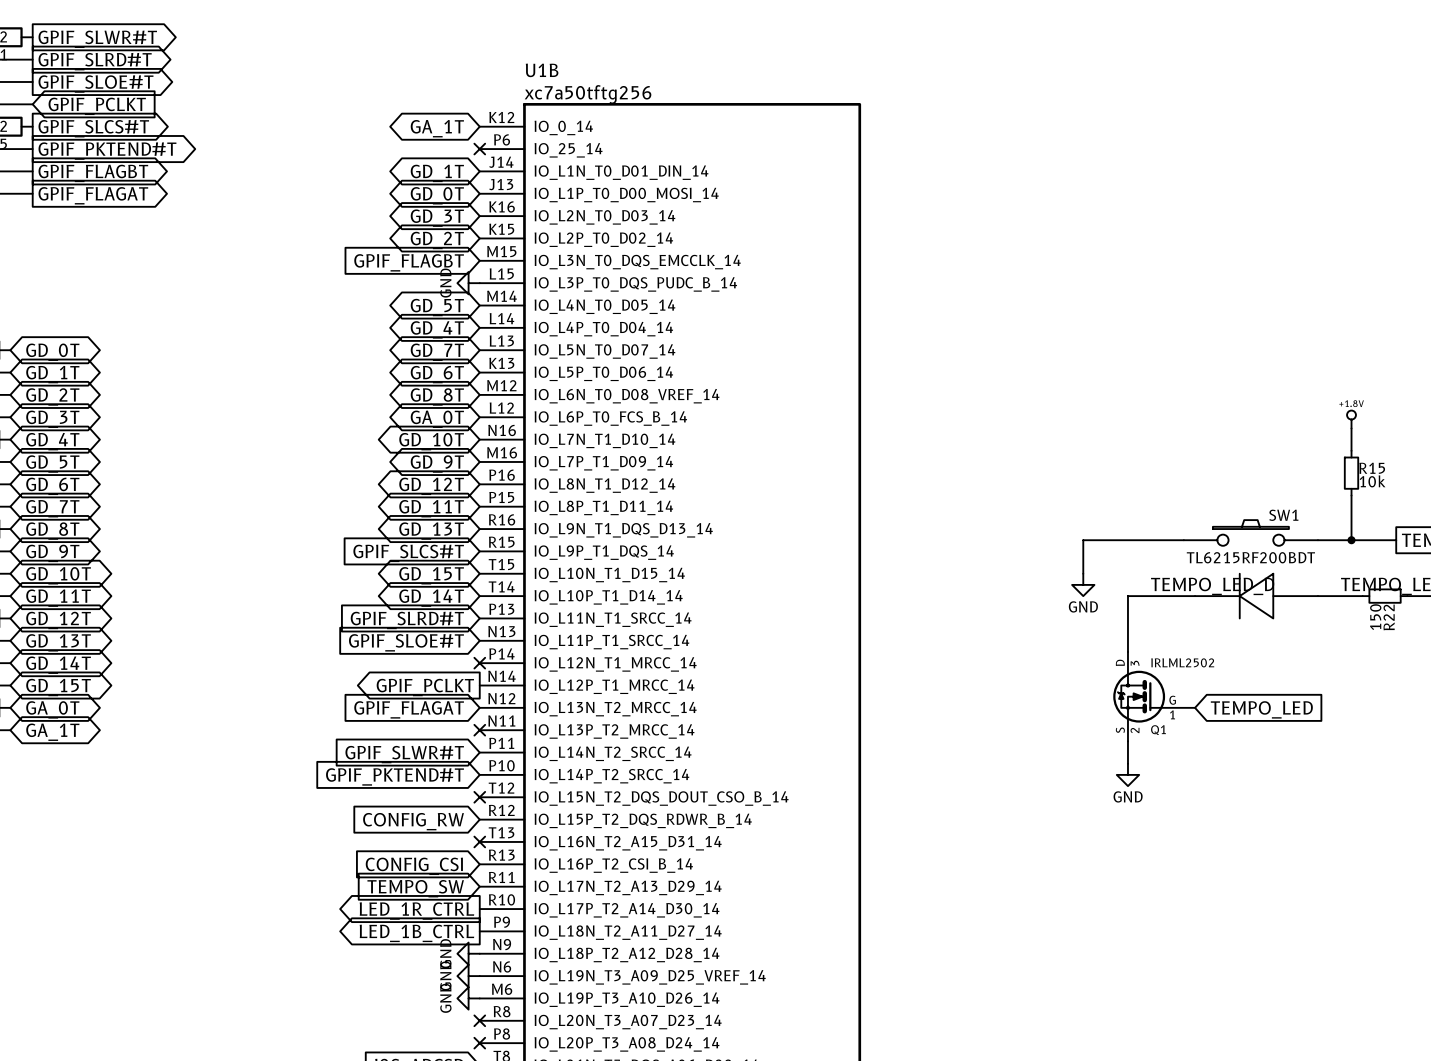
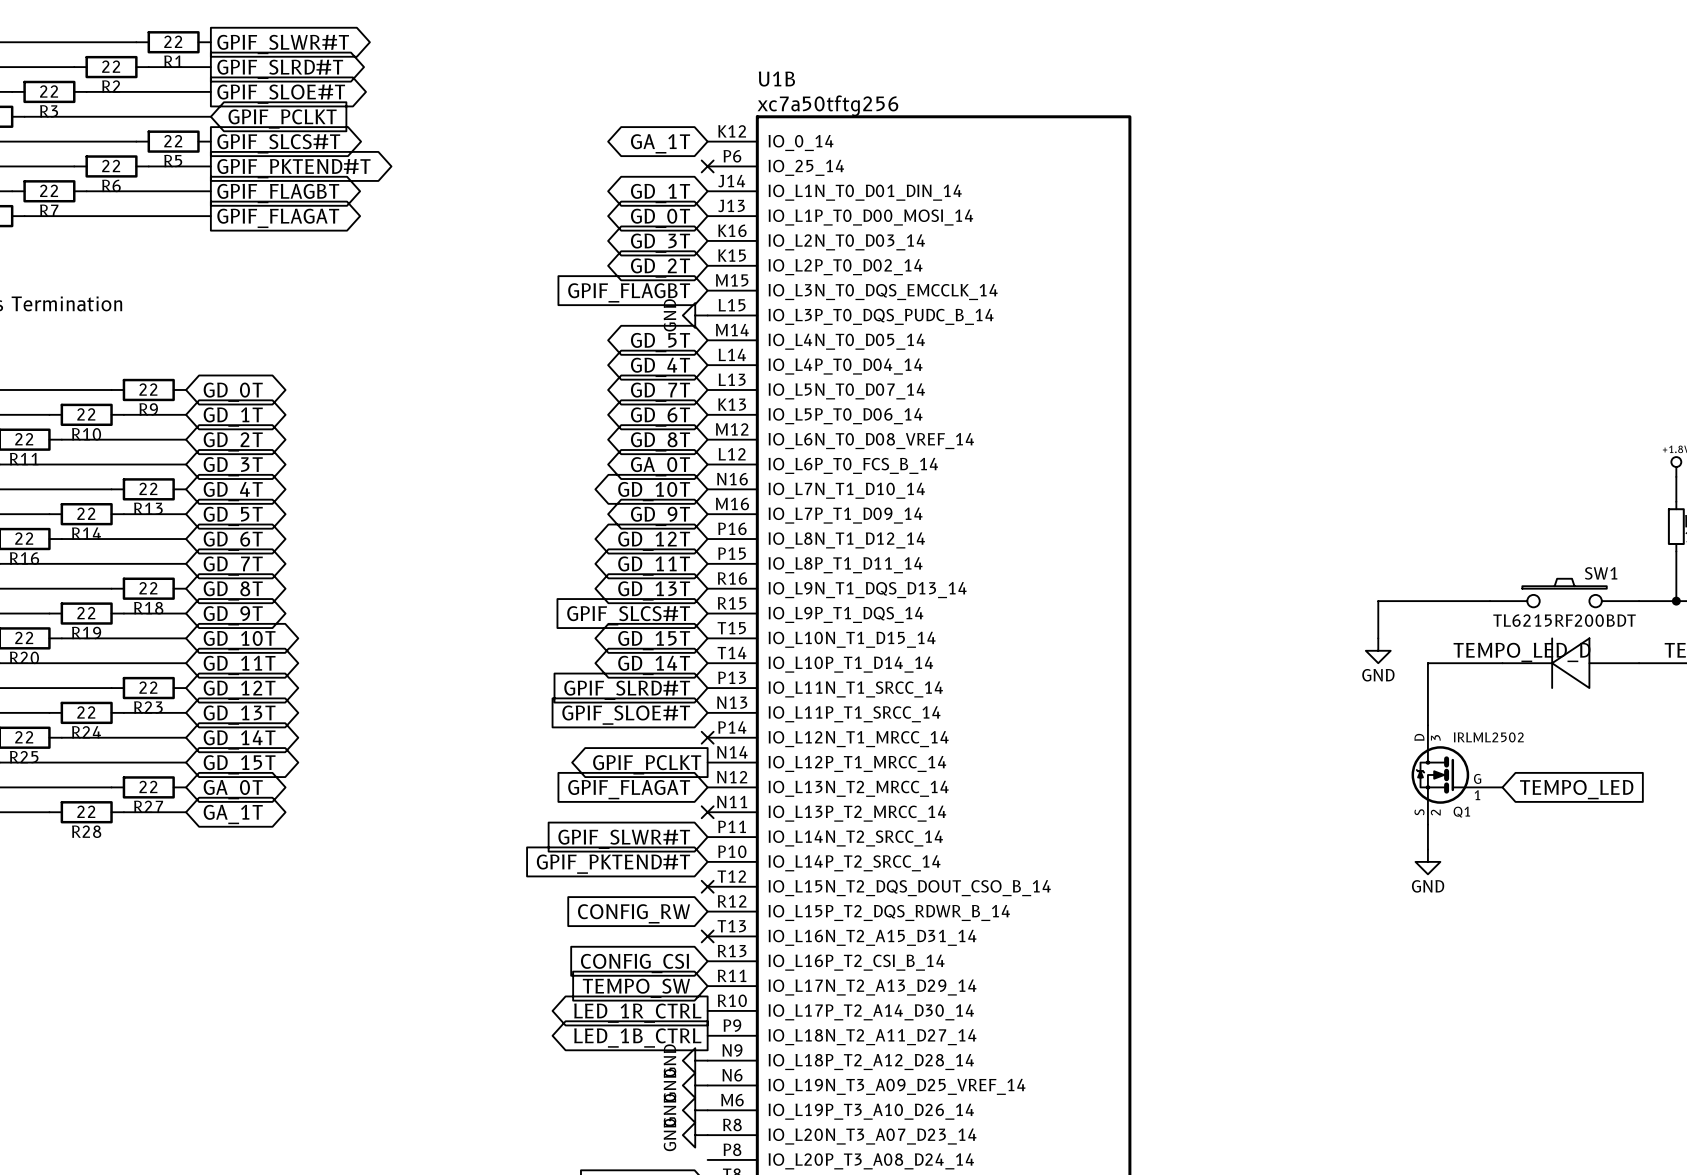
power symbol: none -> GND (695, 1135)
no-connect mark: (479, 1020) -> none
no-connect mark: (479, 1043) -> none

